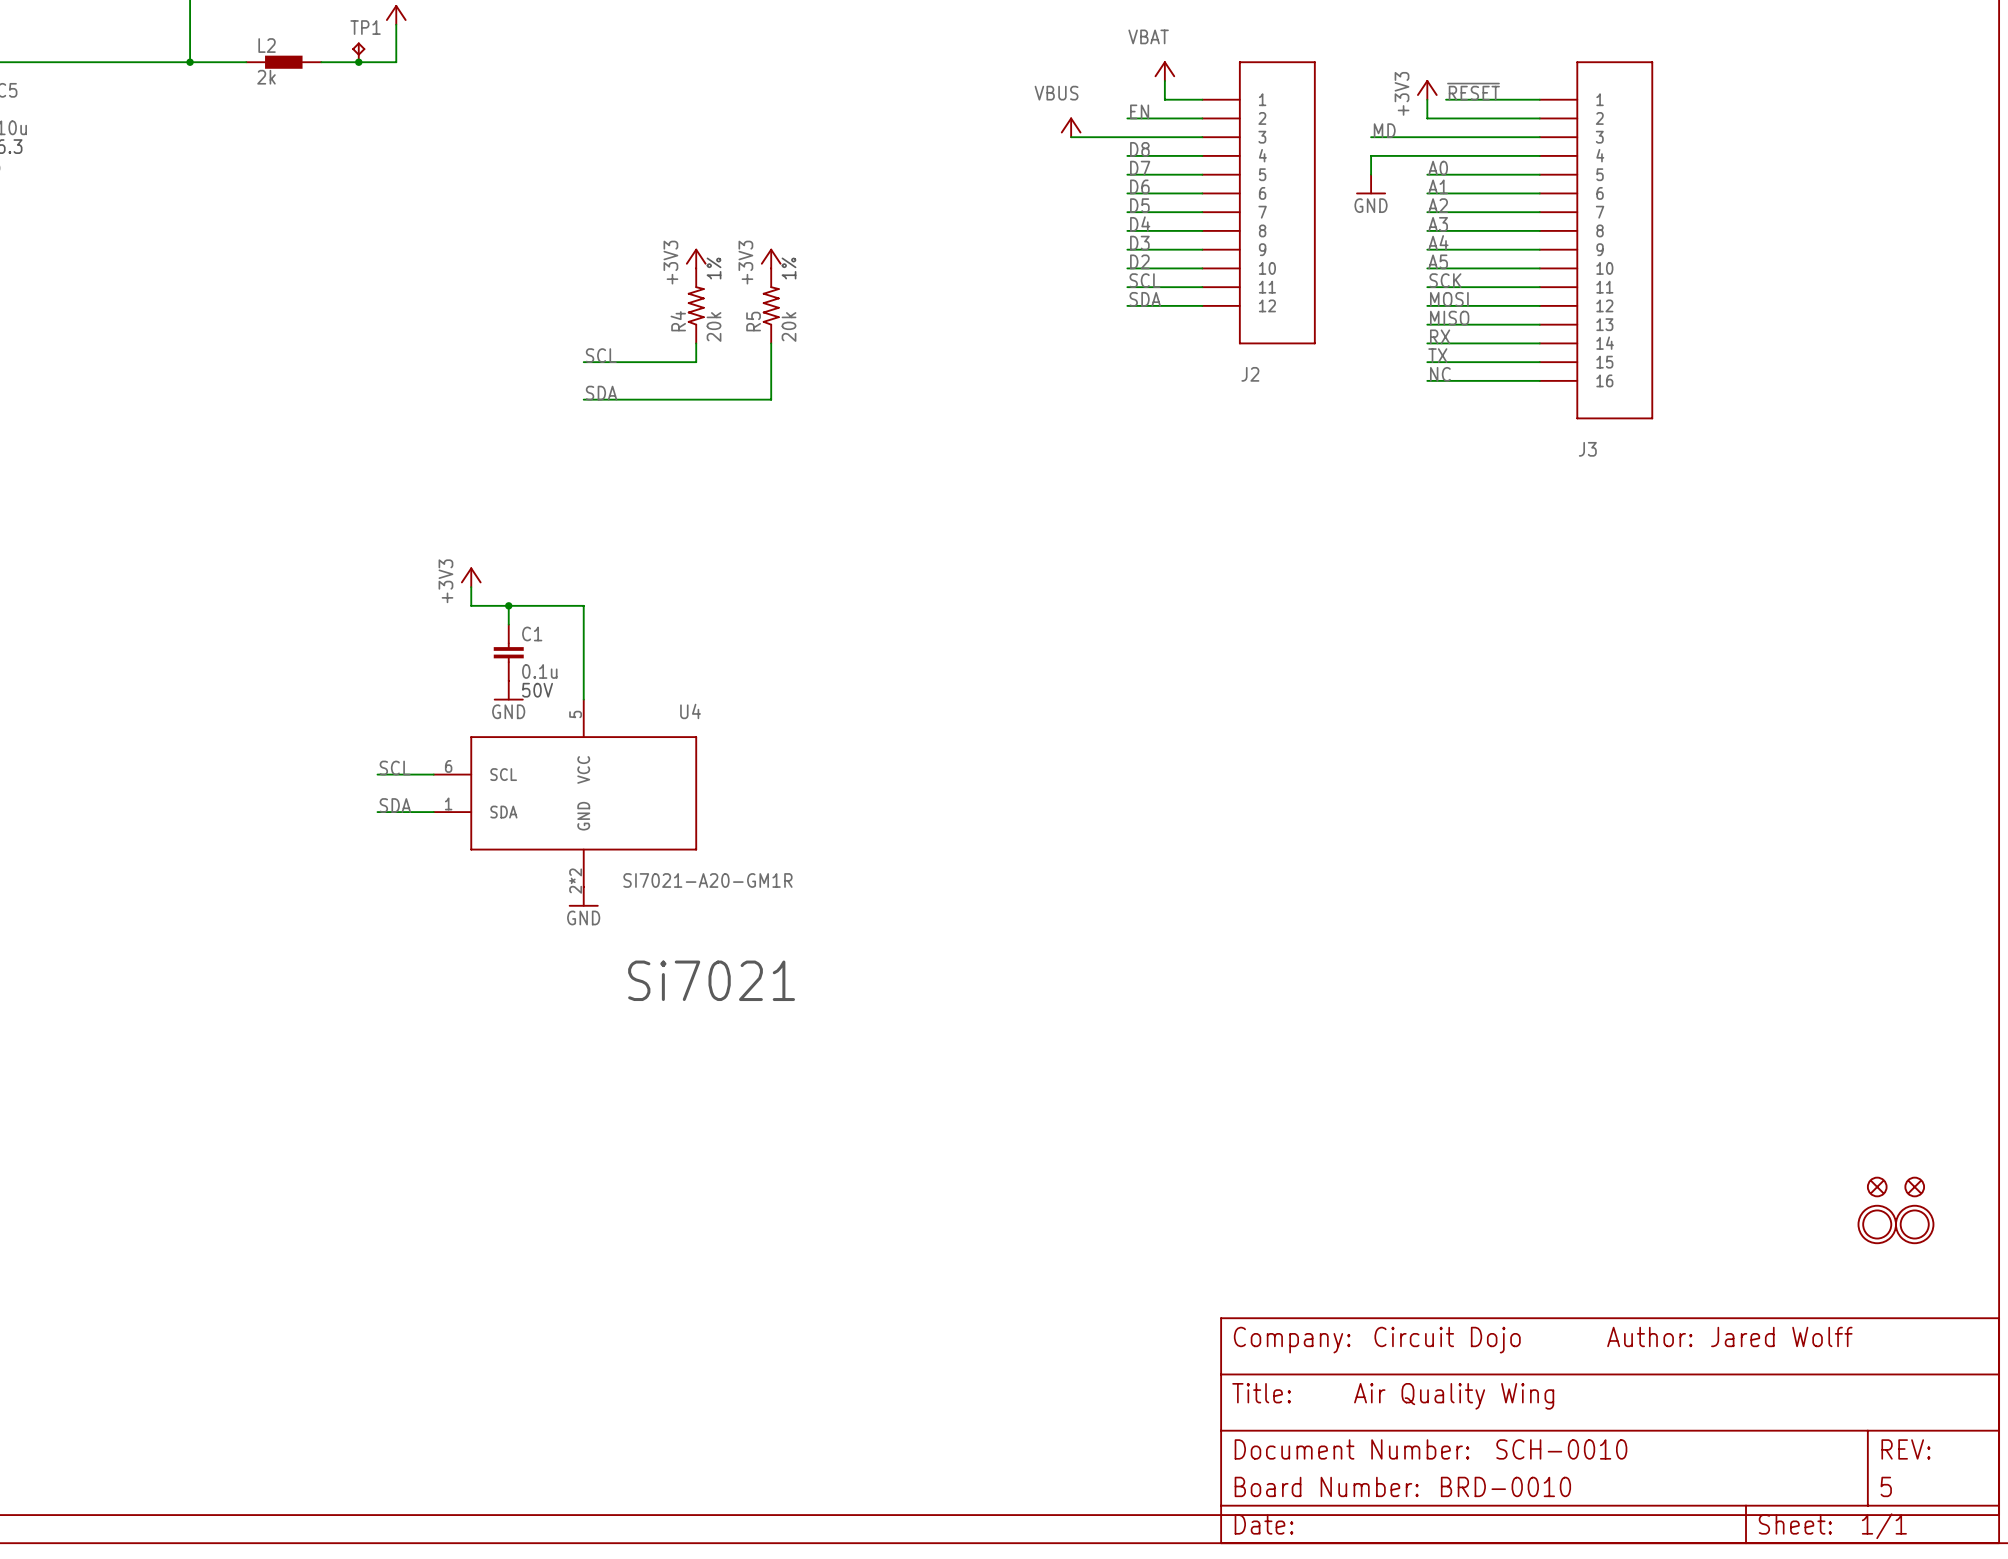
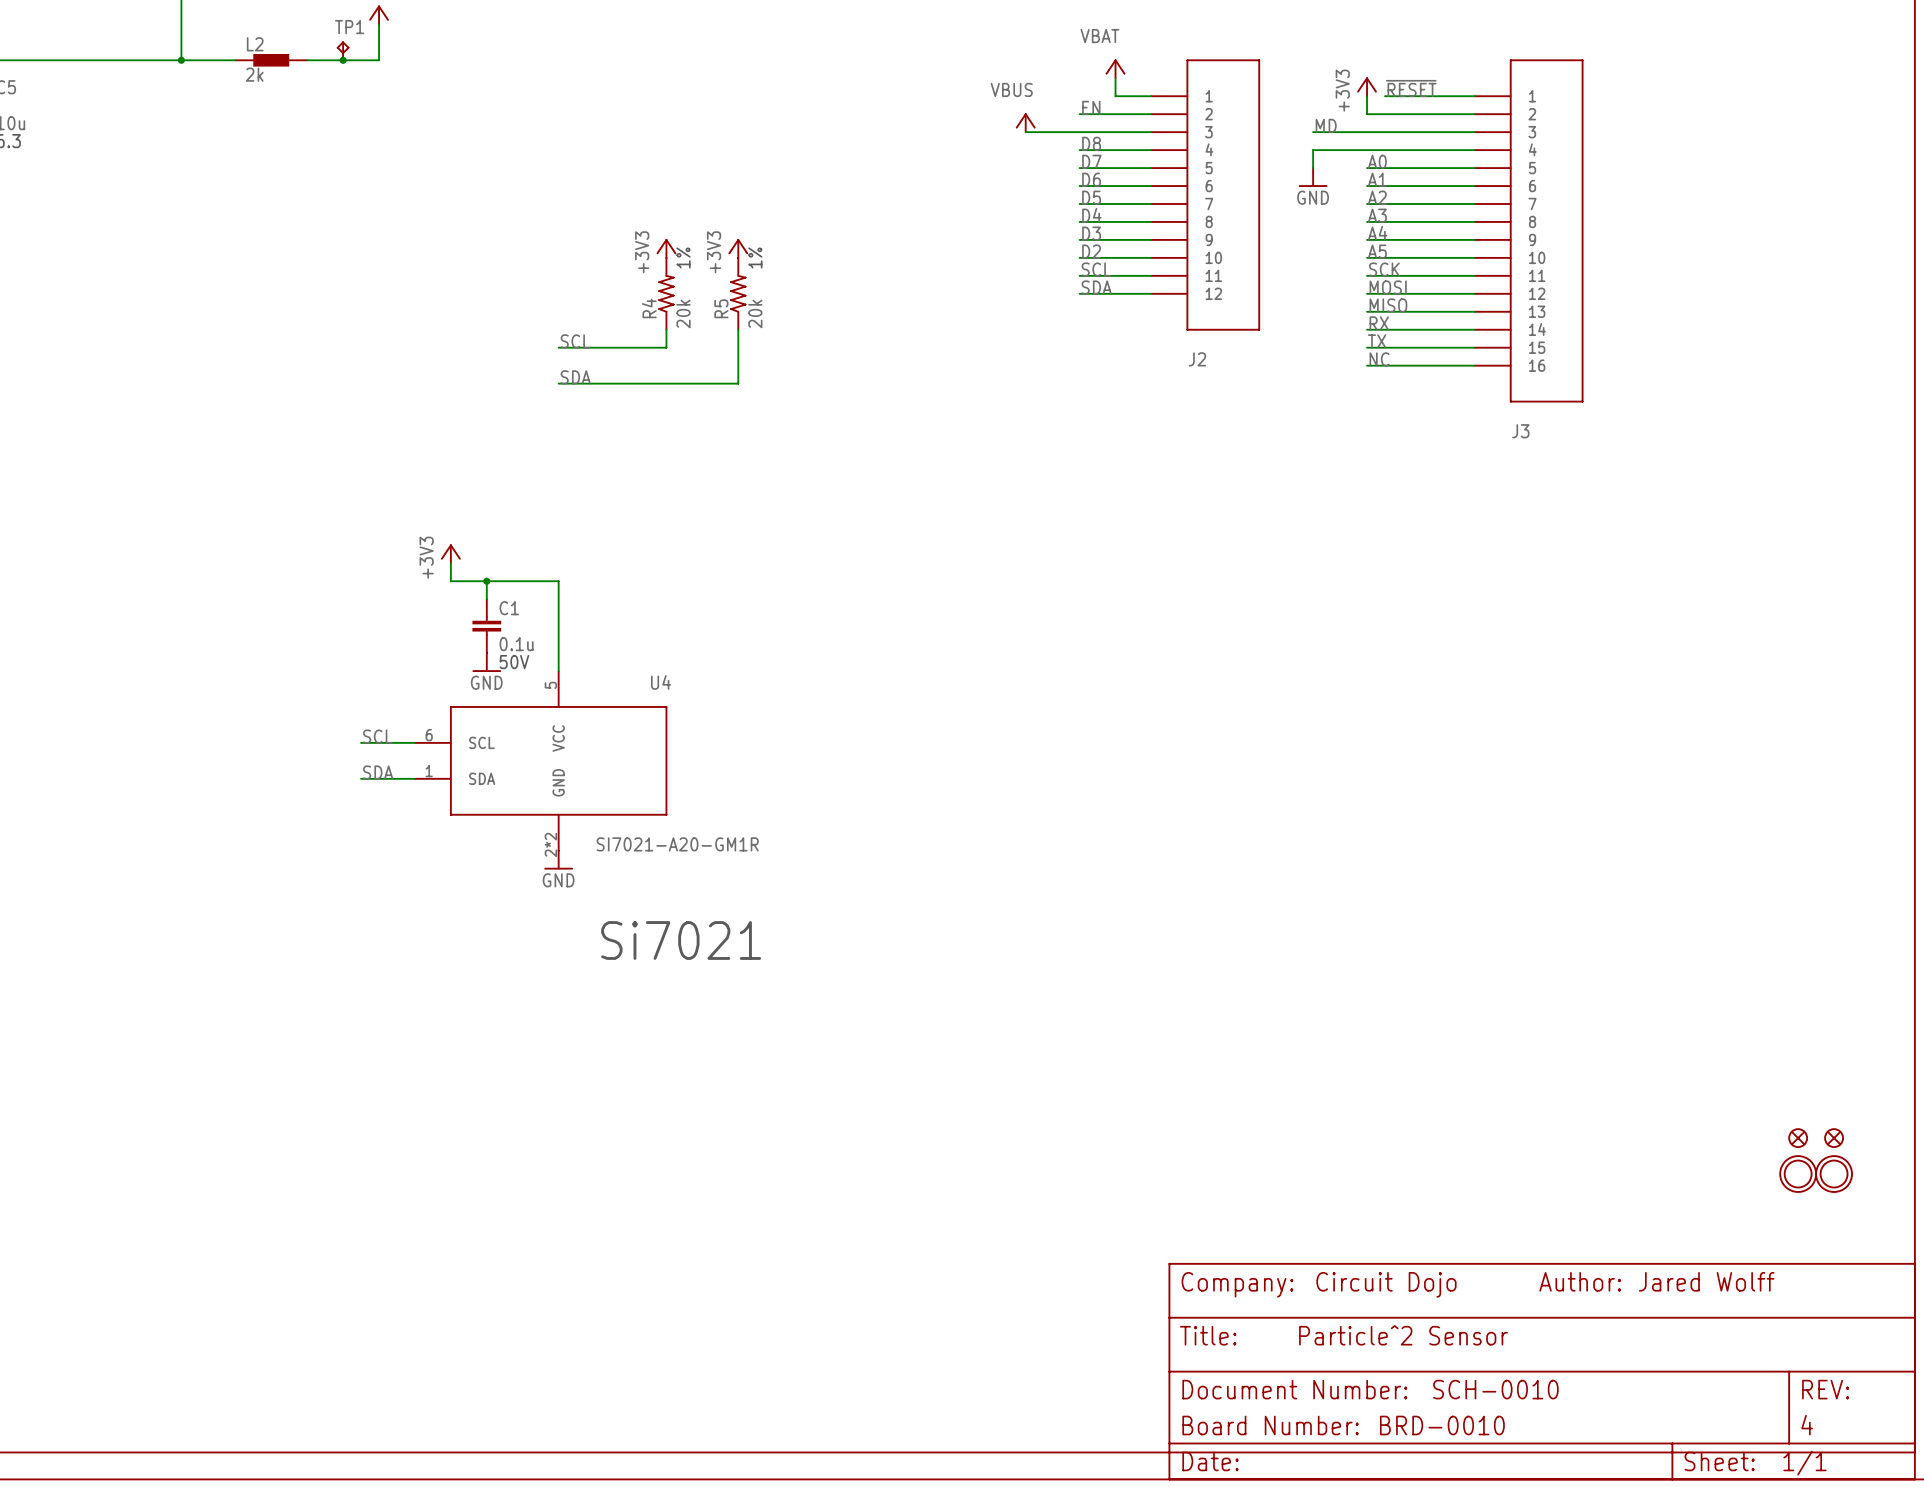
part text: Air Quality Wing (1454, 1396) -> Particle^2 Sensor (1403, 1335)
part text: 5 (1886, 1486) -> 4 (1807, 1425)

